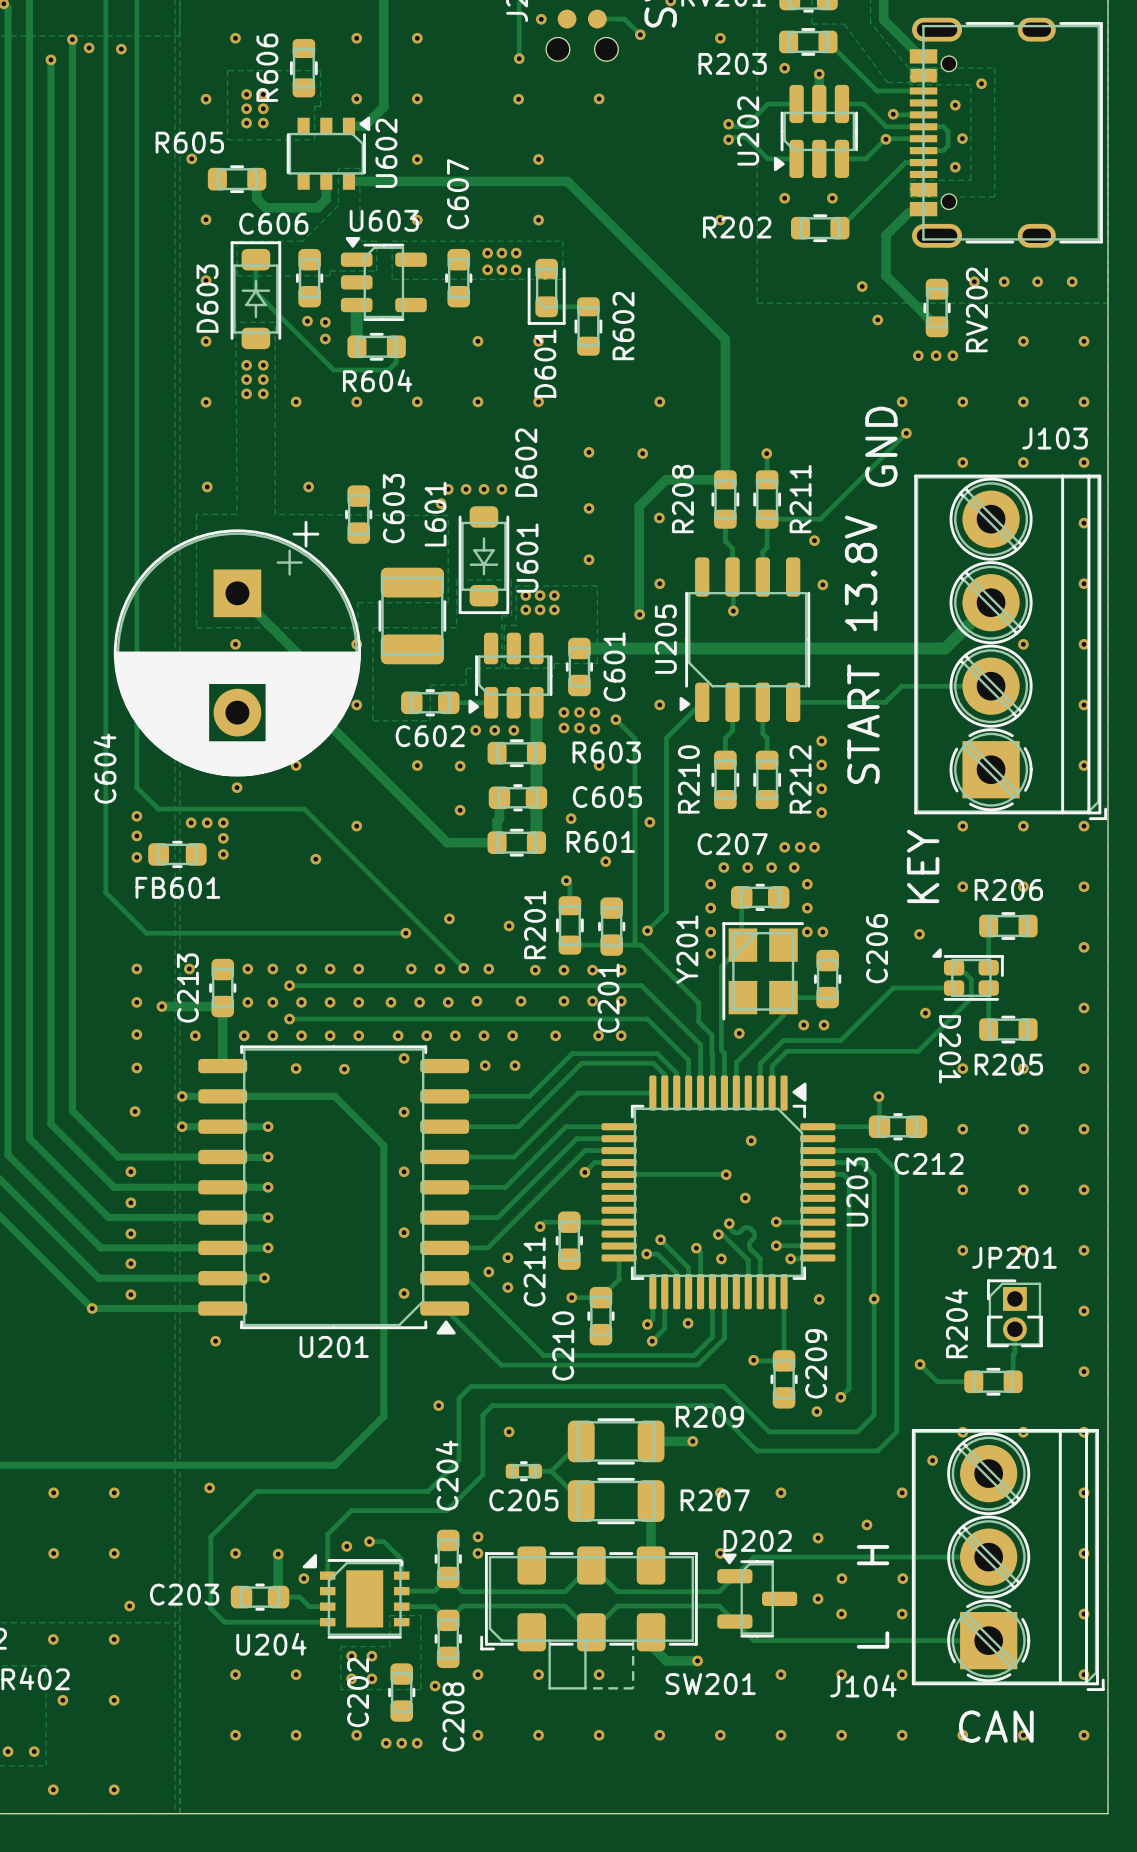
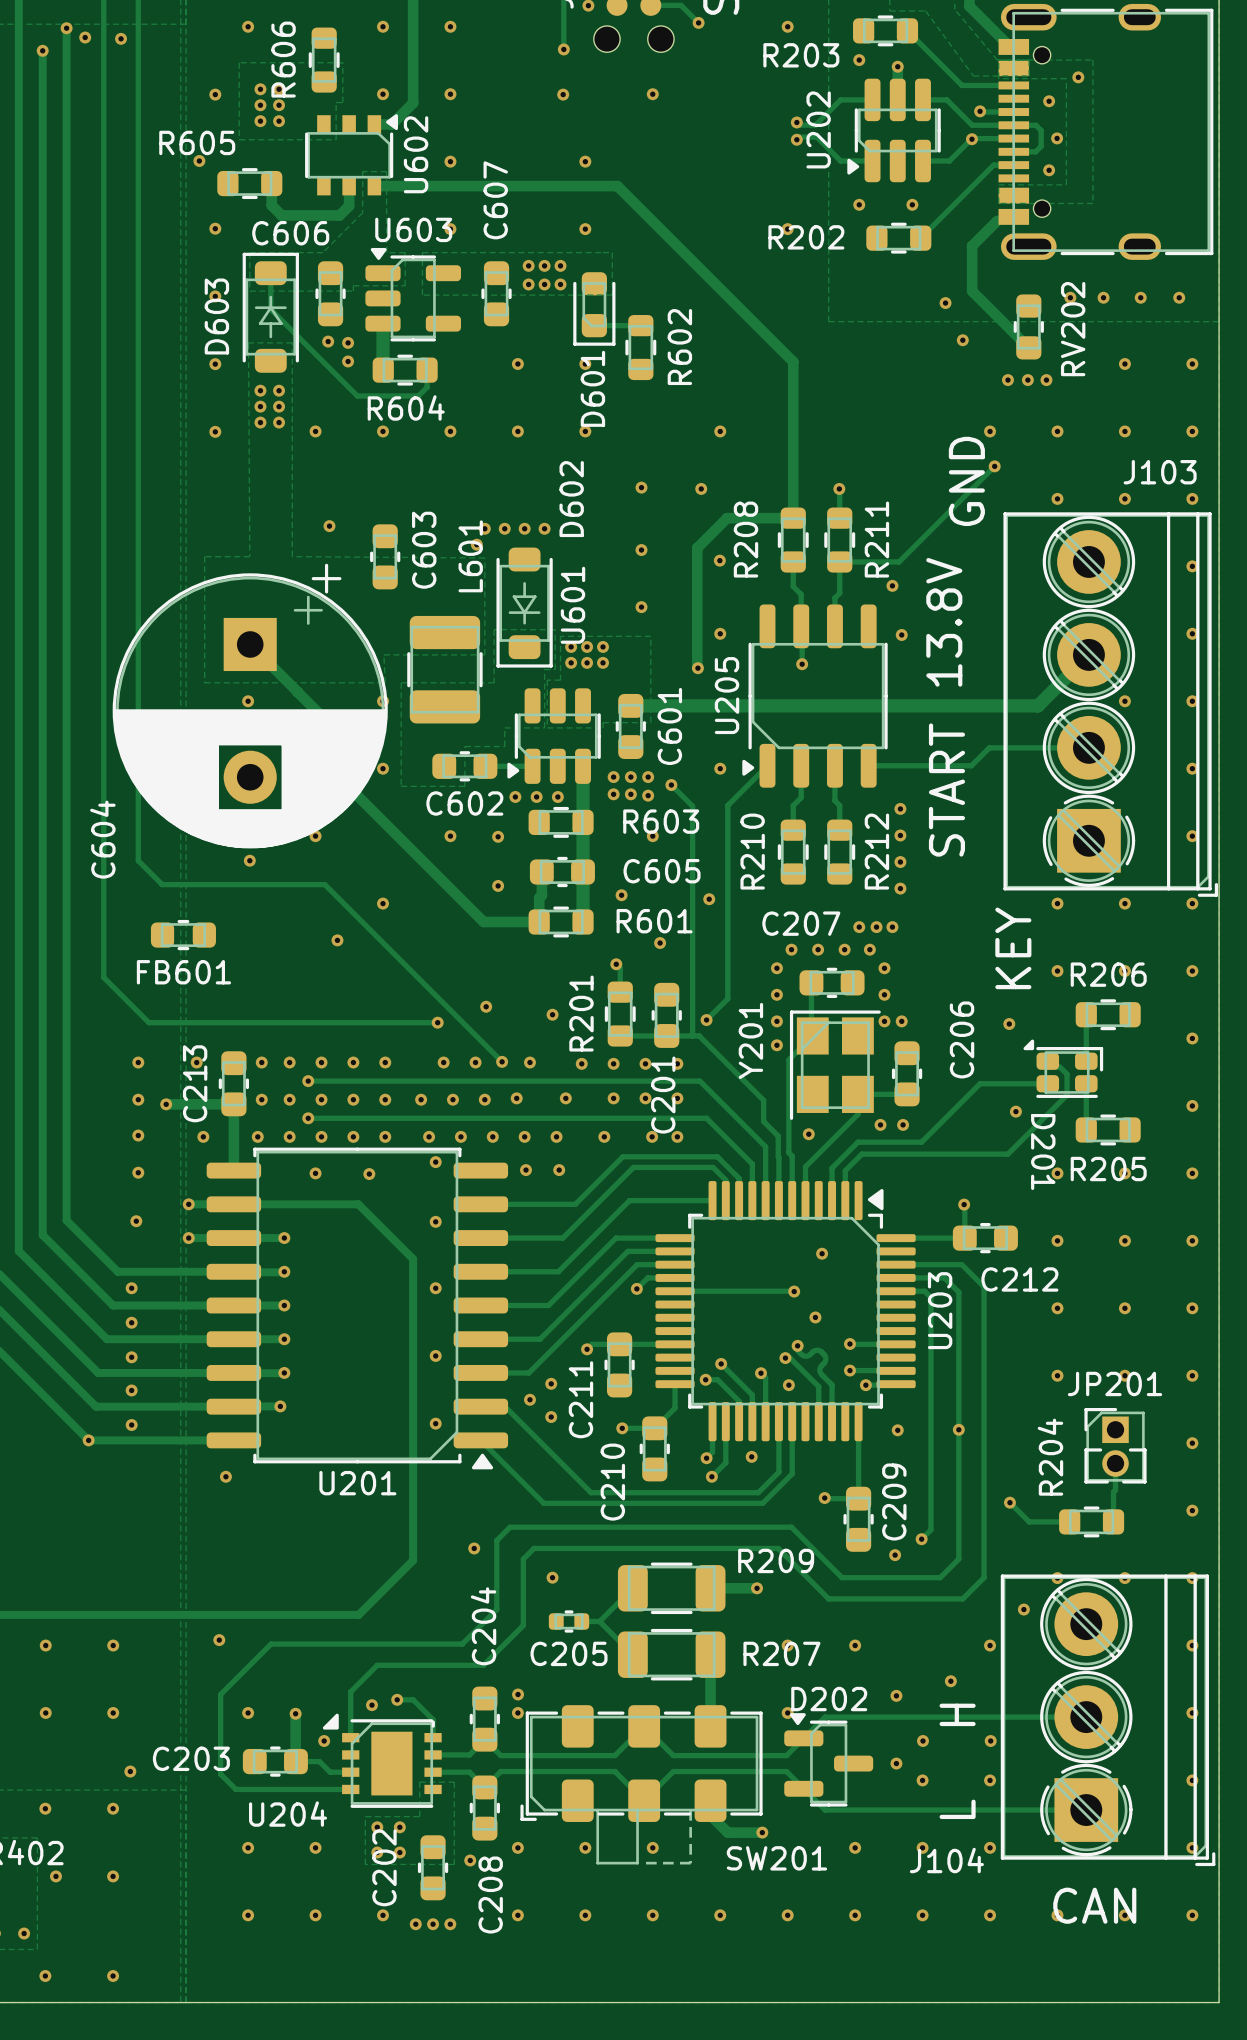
via: (207, 486) -> none
via: (136, 816) -> none
via: (191, 822) -> none
via: (207, 822) -> none
via: (223, 822) -> none
via: (136, 835) -> none
via: (223, 838) -> none
via: (223, 854) -> none
via: (136, 857) -> none

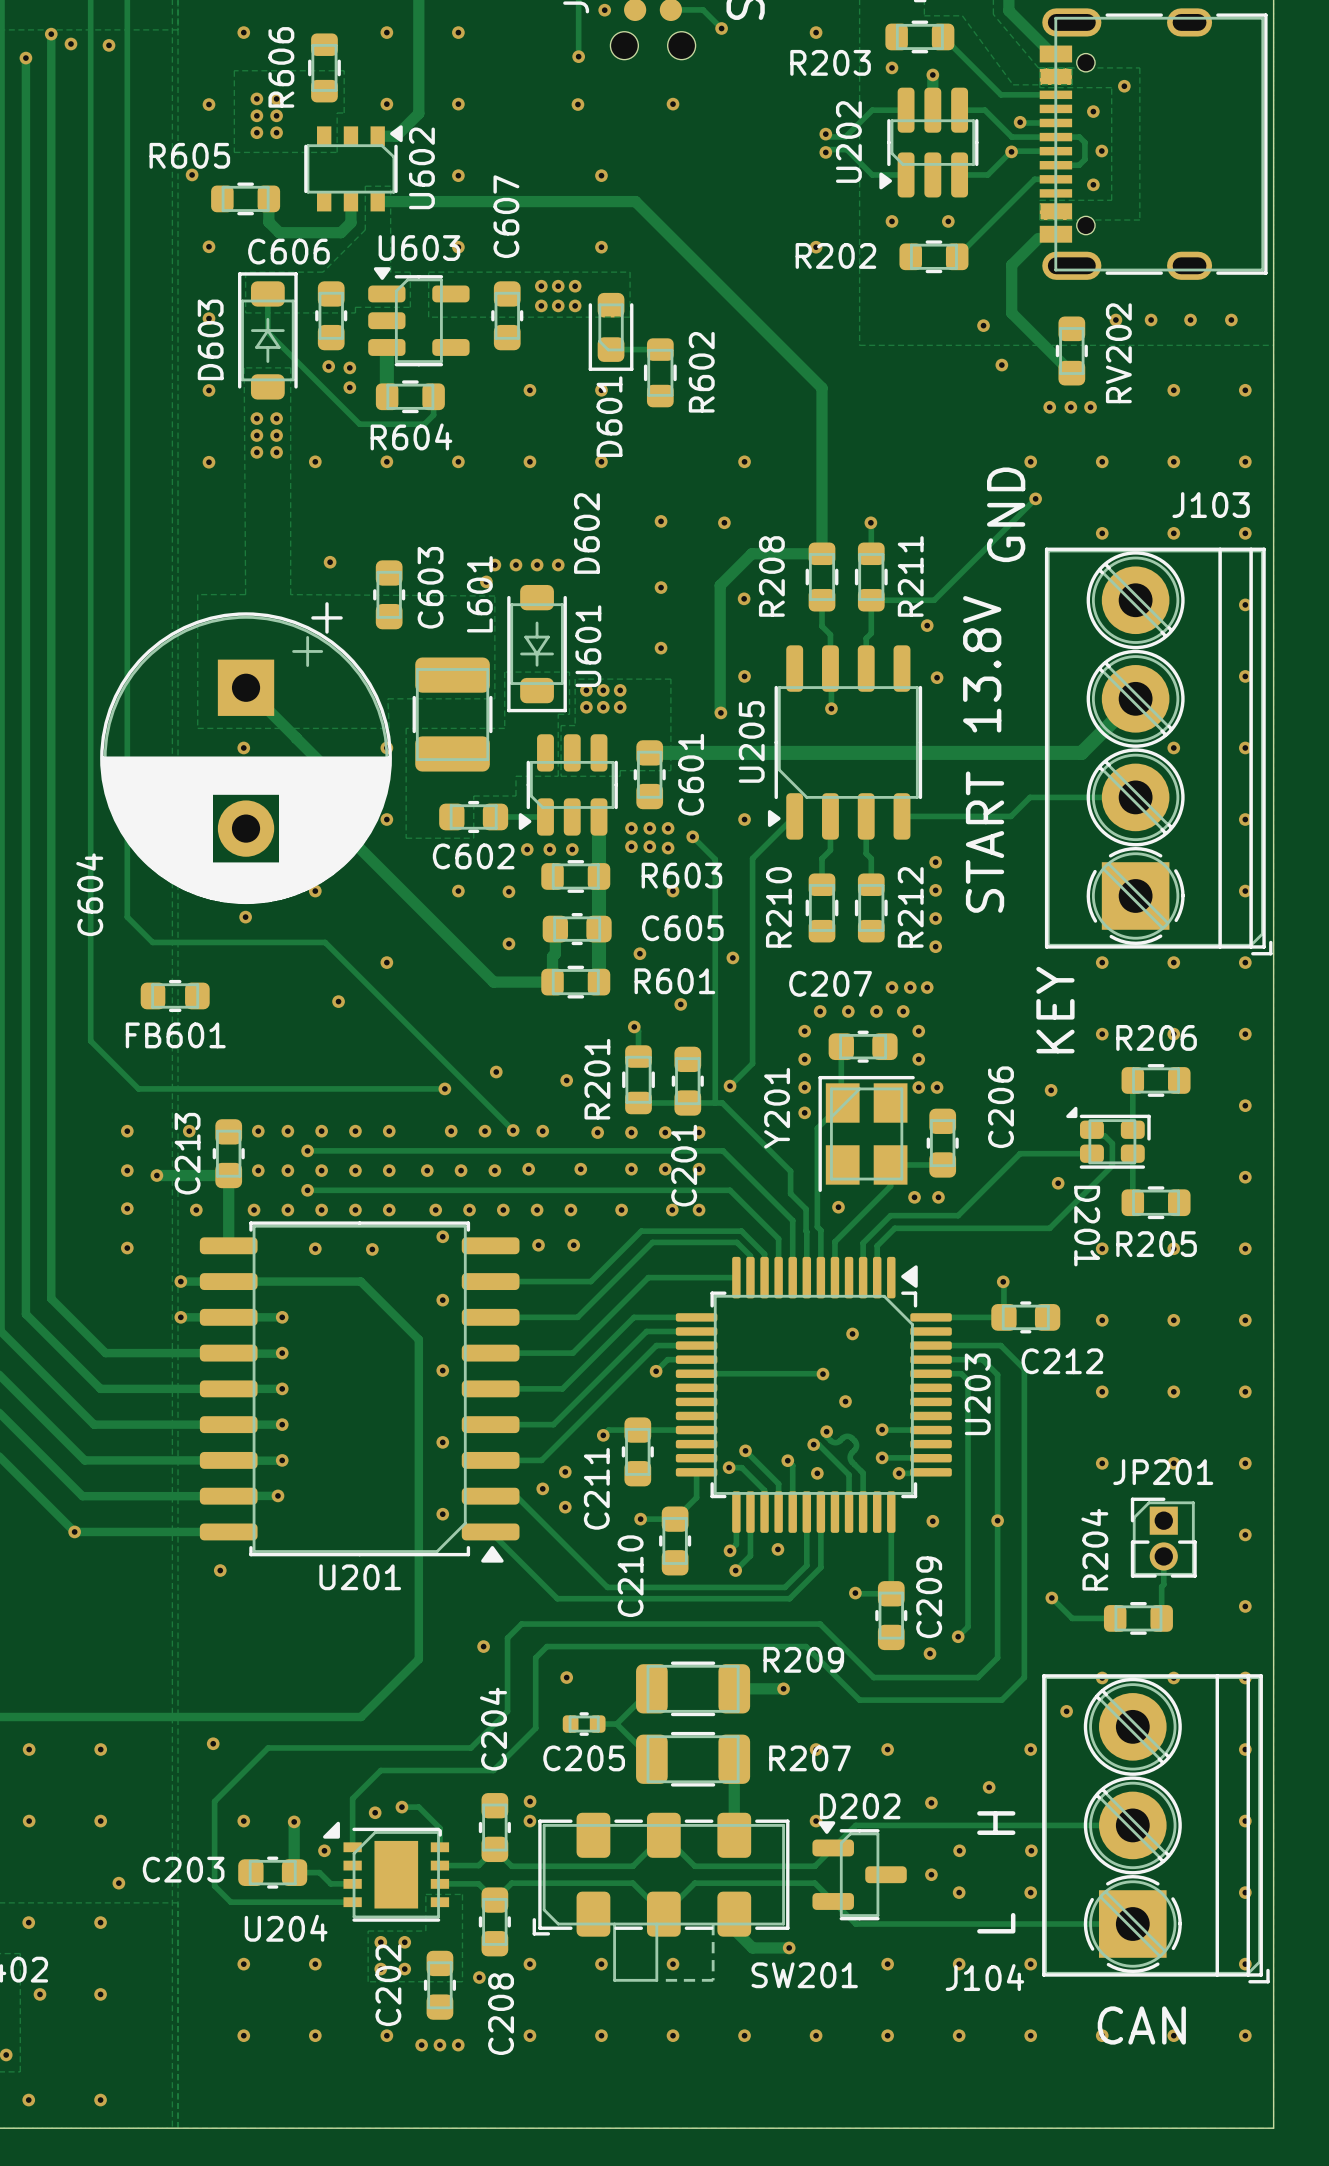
via: (136, 1221) -> none
via: (131, 1288) -> none
via: (131, 1322) -> none
via: (131, 1357) -> none
via: (131, 1390) -> none
via: (131, 1424) -> none

